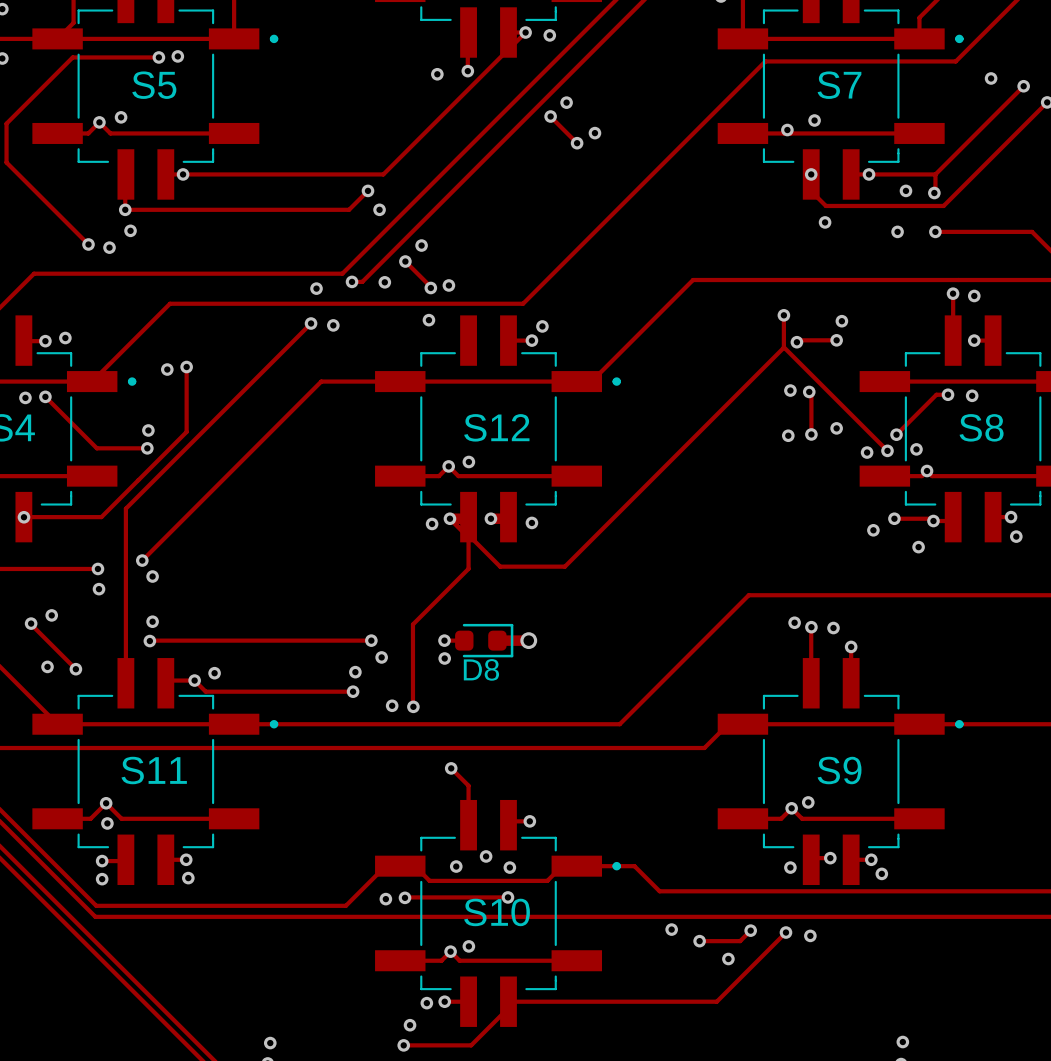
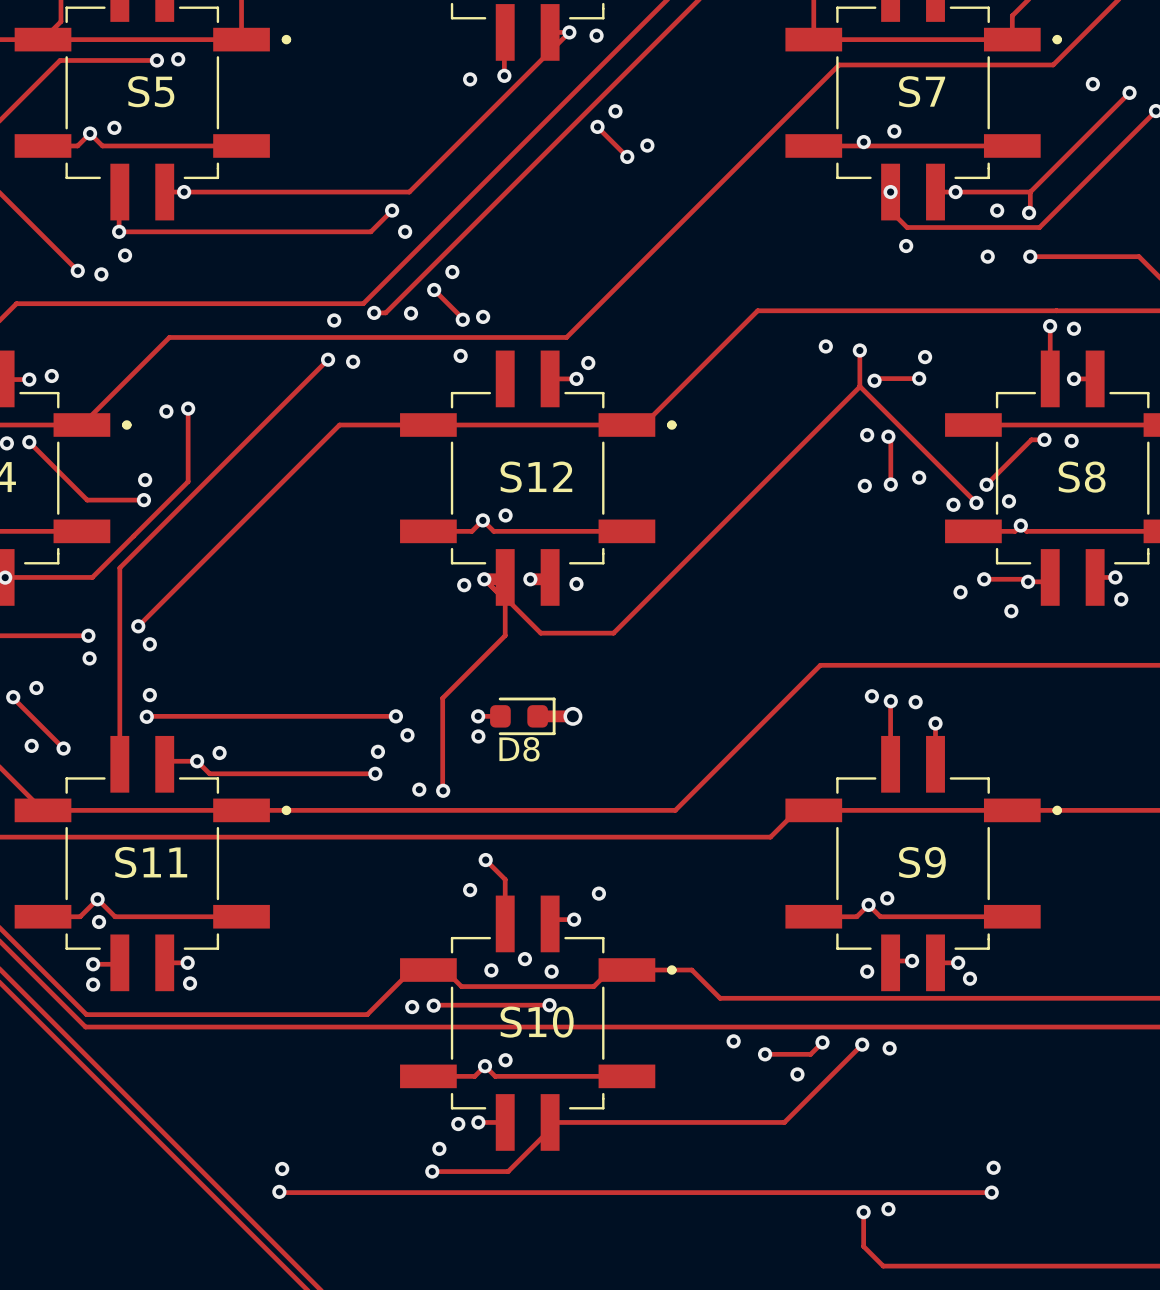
via: none -> (825, 346)
via: none -> (470, 890)
via: none -> (598, 893)

